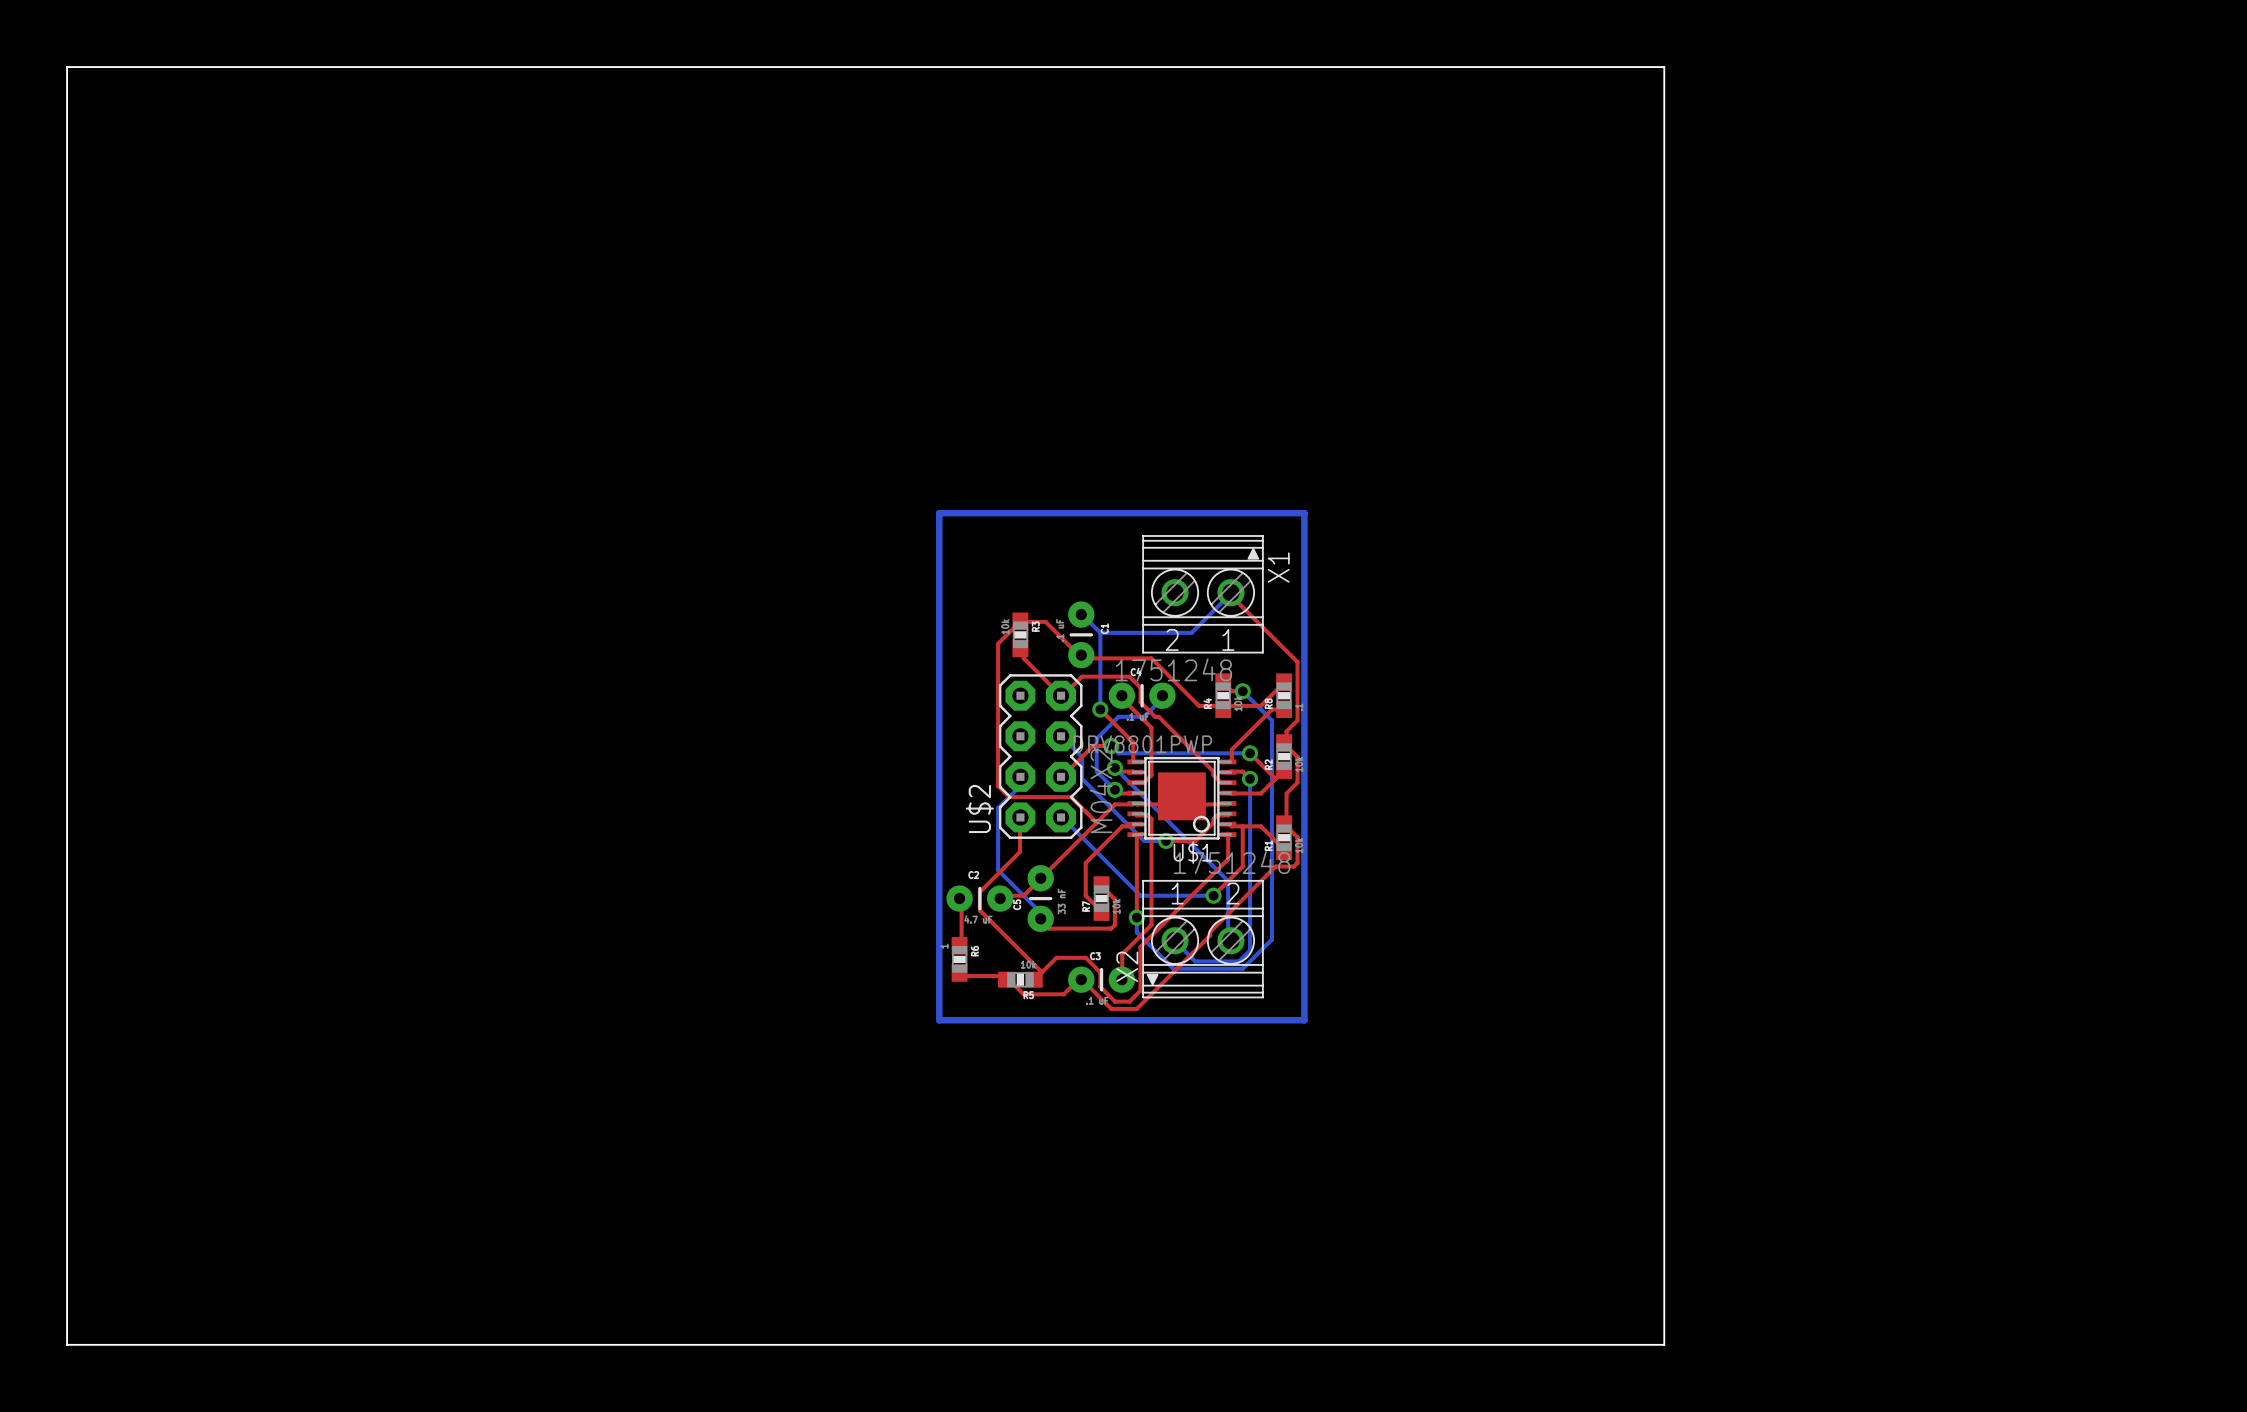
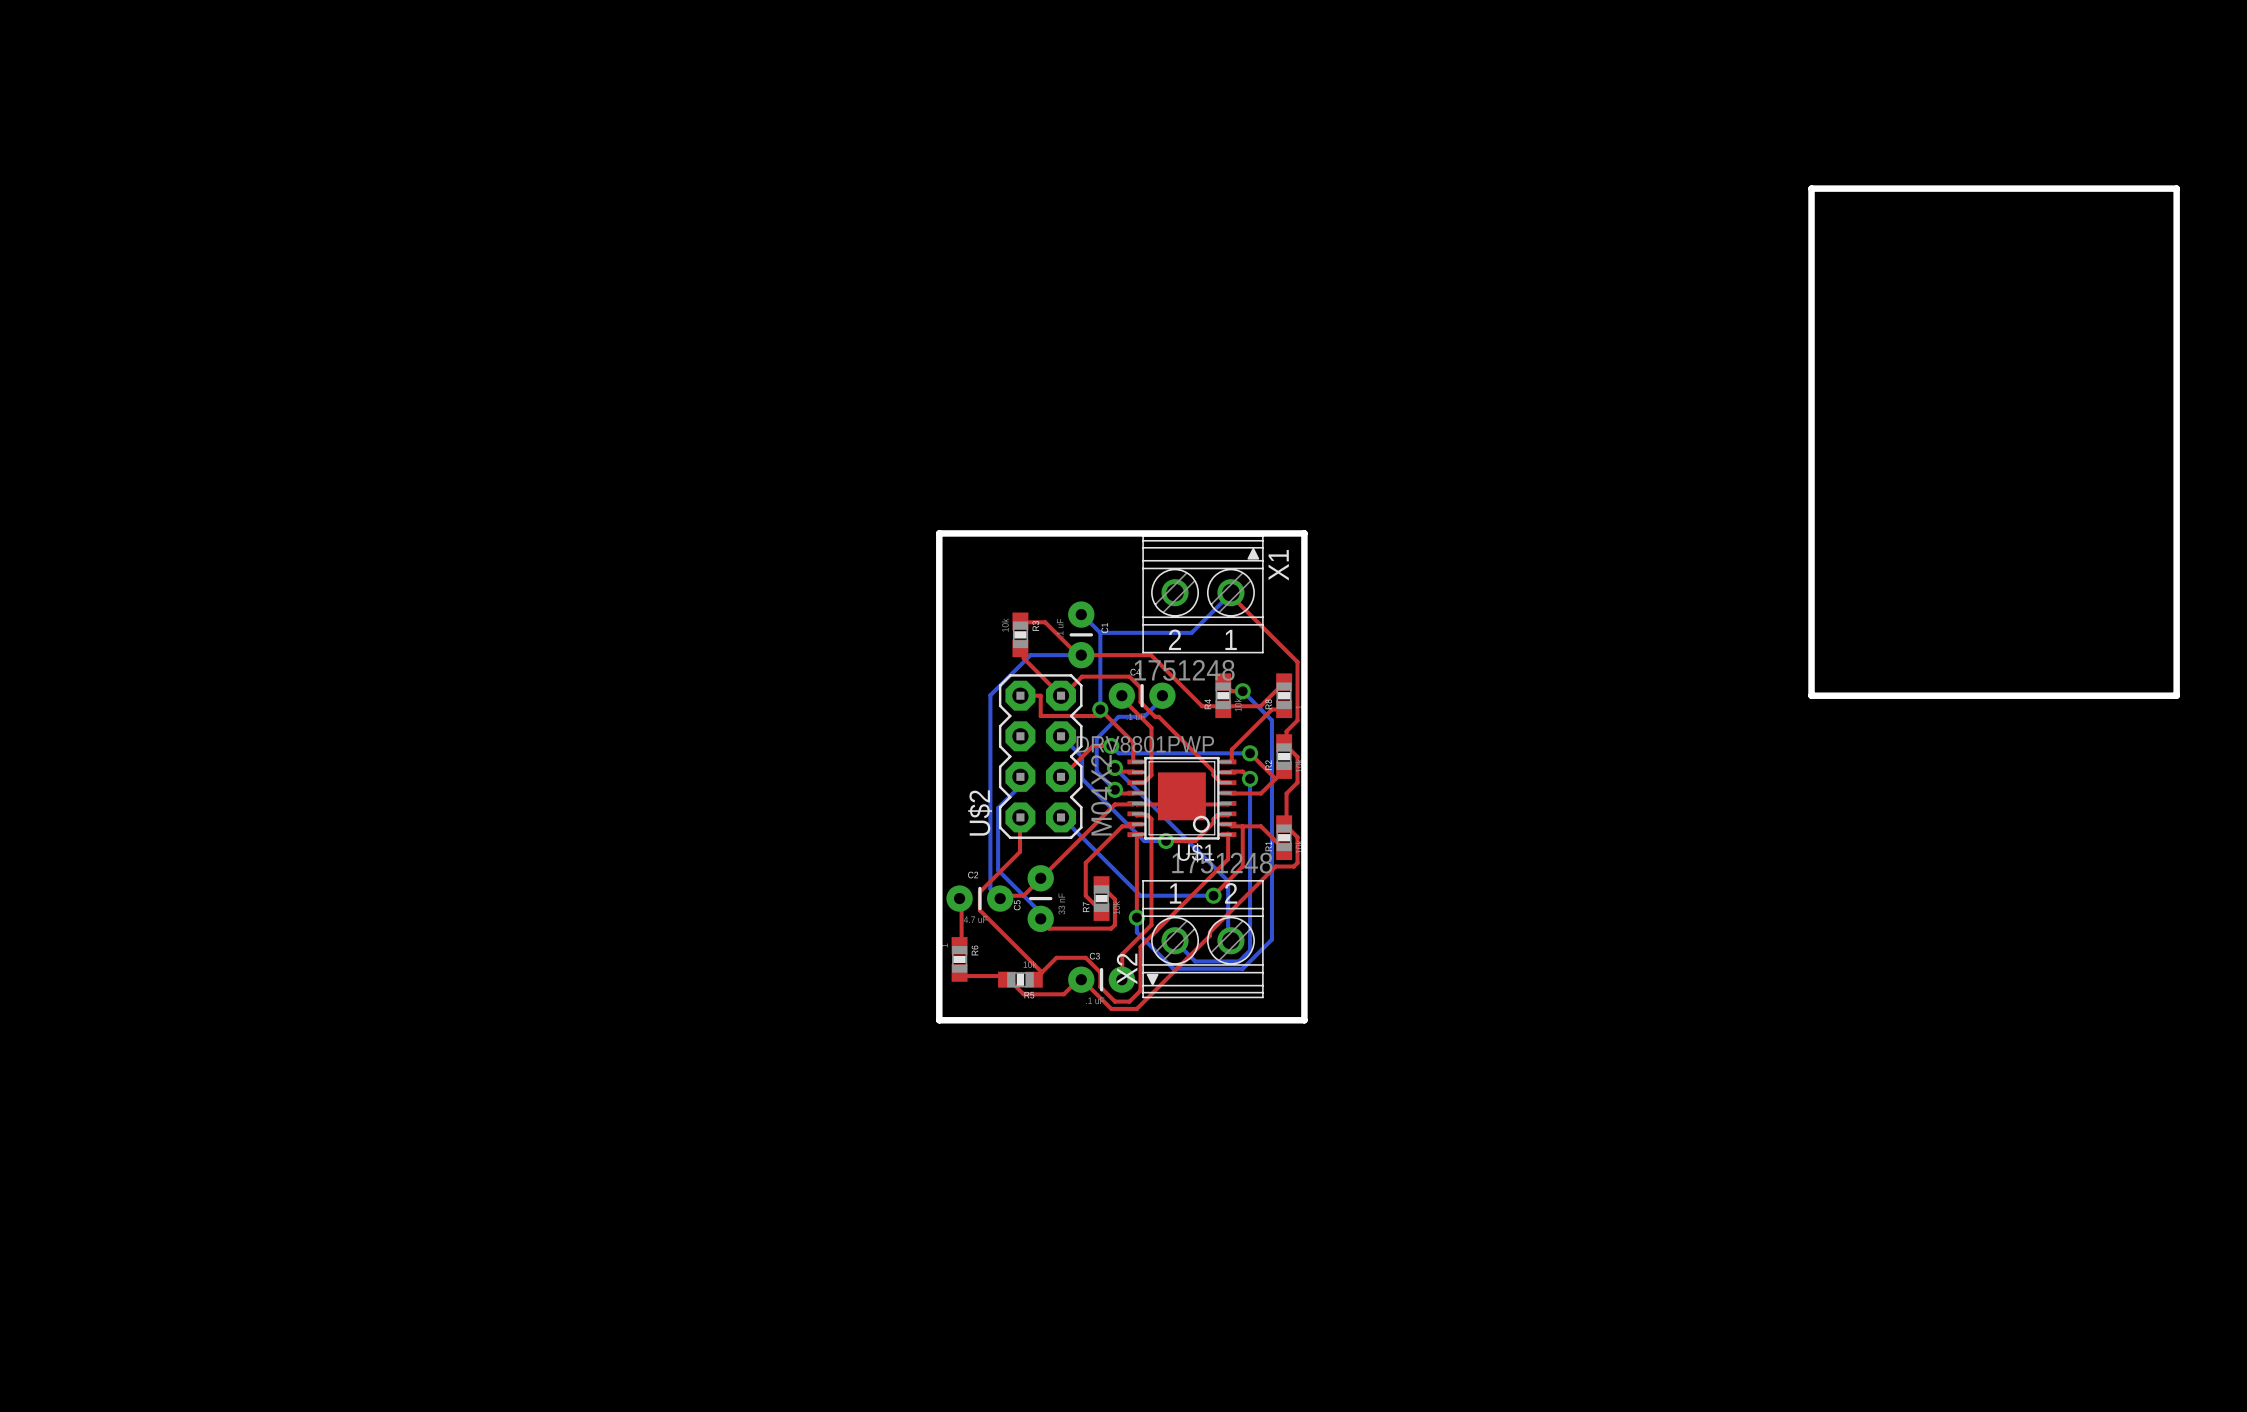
board edge: (67, 67) (1664, 67) (1664, 1344) (67, 1344) (67, 67) -> none
board edge: none -> (1811, 188) (1811, 695) (2176, 695) (2176, 188) (1811, 188)
bottom track: (939, 513) (939, 1020) (1304, 1020) (1304, 513) (939, 513) -> none
board edge: none -> (939, 533) (939, 1020) (1304, 1020) (1304, 533) (939, 533)
bottom track: none -> (1081, 655) (1030, 655) (990, 695) (990, 888) (1000, 898)
top track: none -> (1020, 695) (1040, 695) (1040, 716) (1100, 716) (1100, 709)
top track: (1261, 705) (1224, 705) (1223, 709) (1220, 705) (1198, 705) (1151, 658) (1082, 658) (1081, 655) (1078, 654) (1045, 621) (1020, 621) (998, 643) (998, 786) (1009, 797) (1071, 797) (1096, 822) -> (1261, 705) (1224, 706) (1223, 709) (1220, 706) (1202, 706) (1151, 655) (1078, 655) (1045, 622) (1020, 621)

